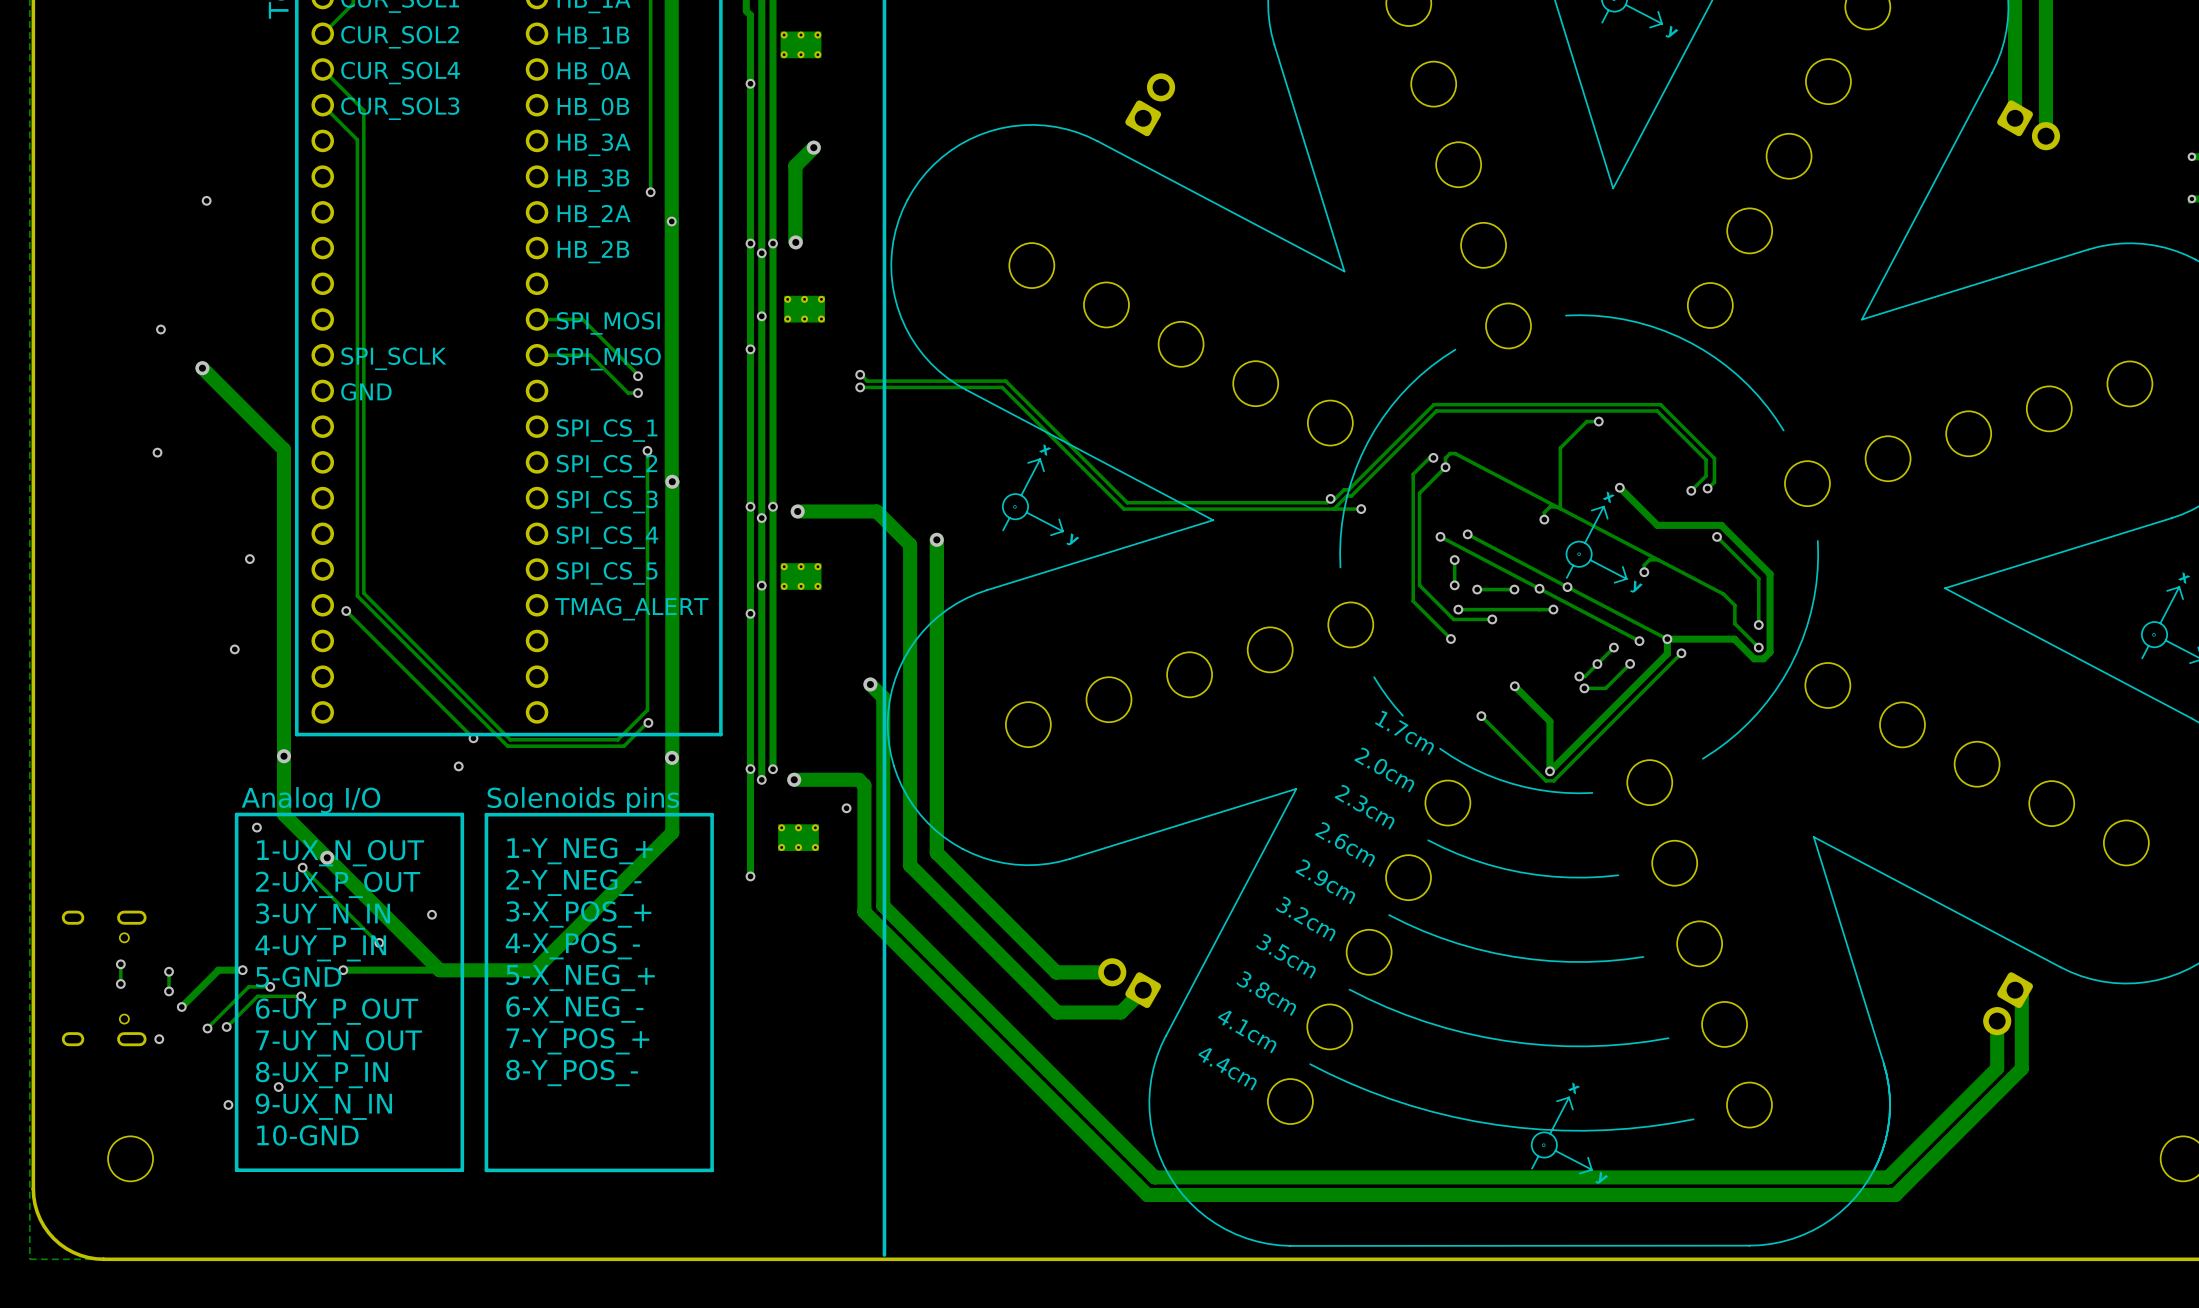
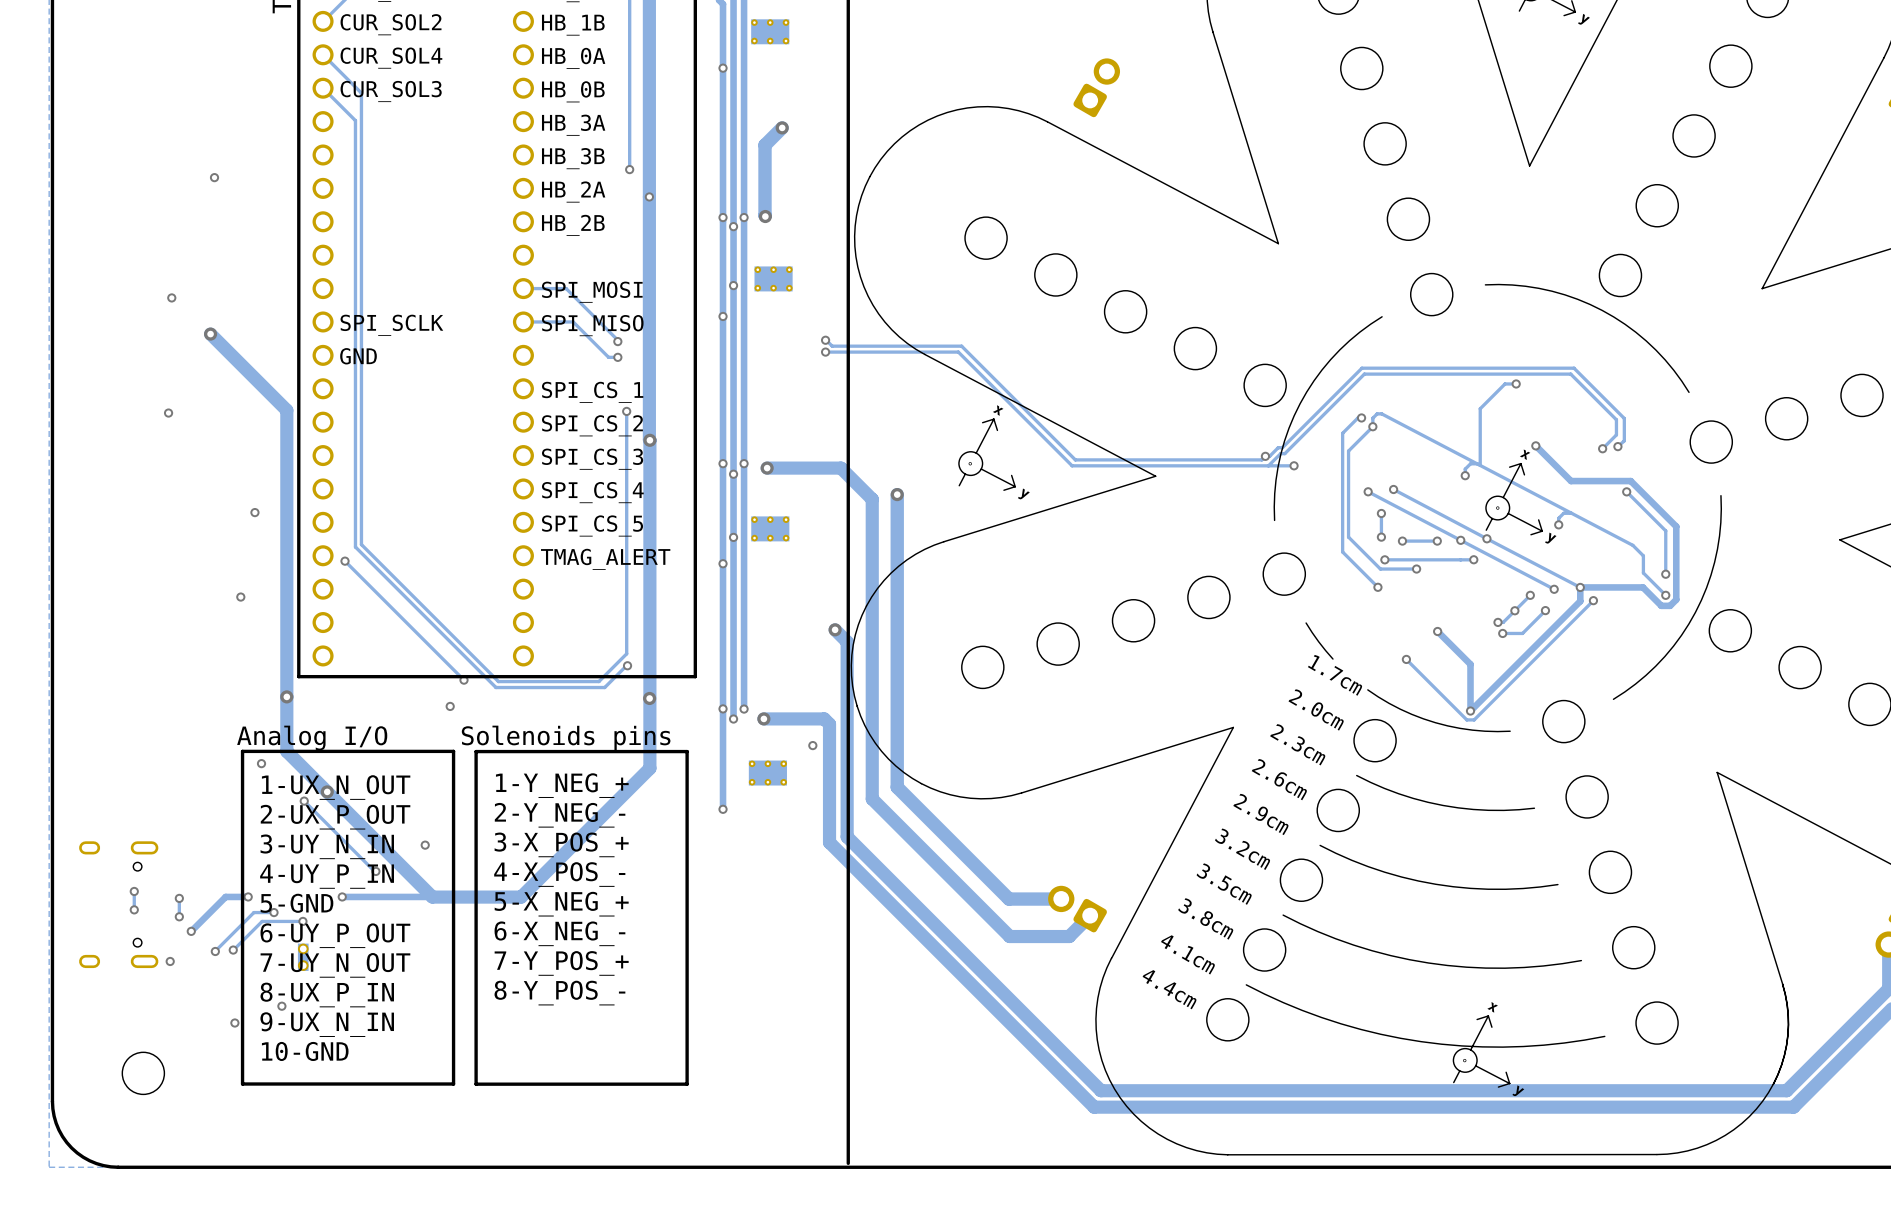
part: none -> (303, 957)

